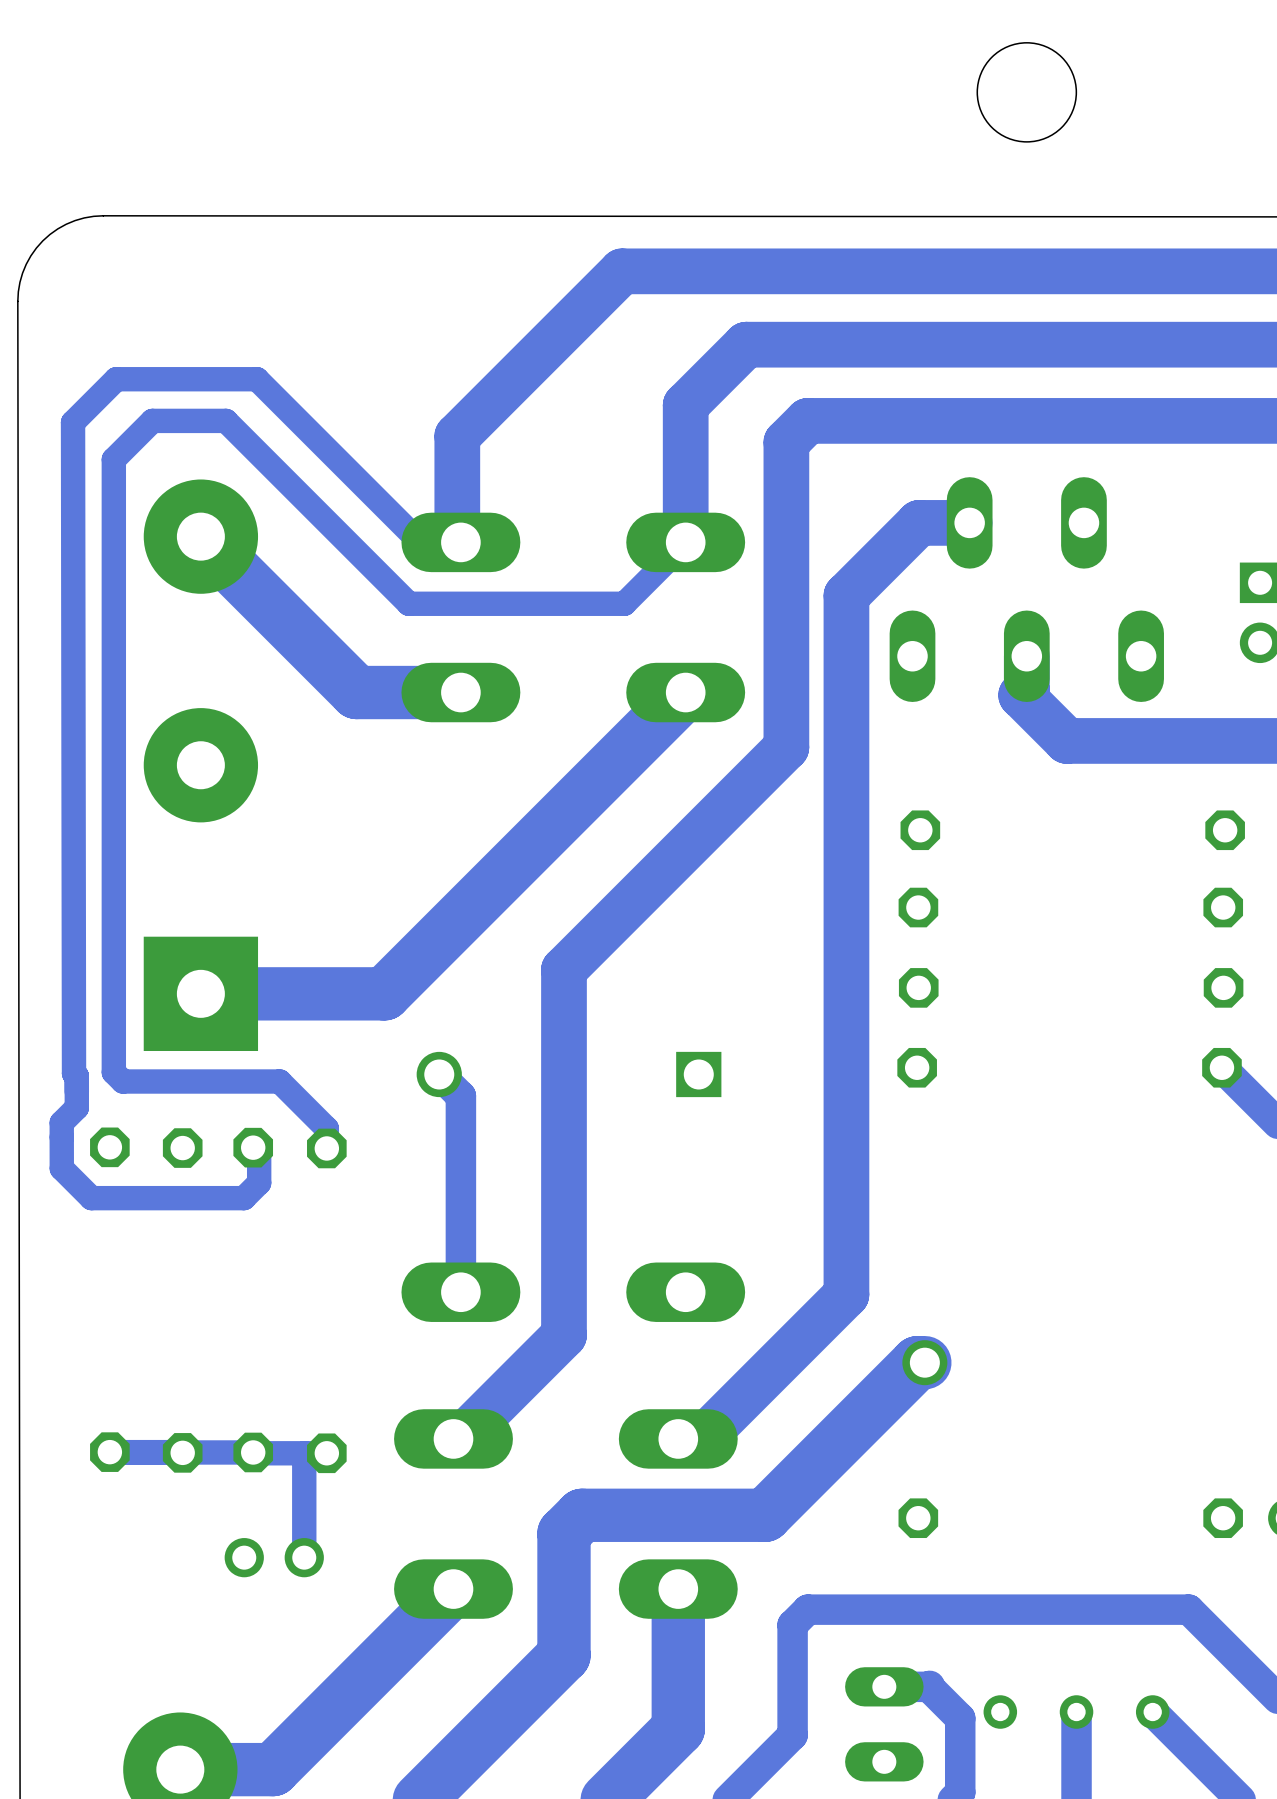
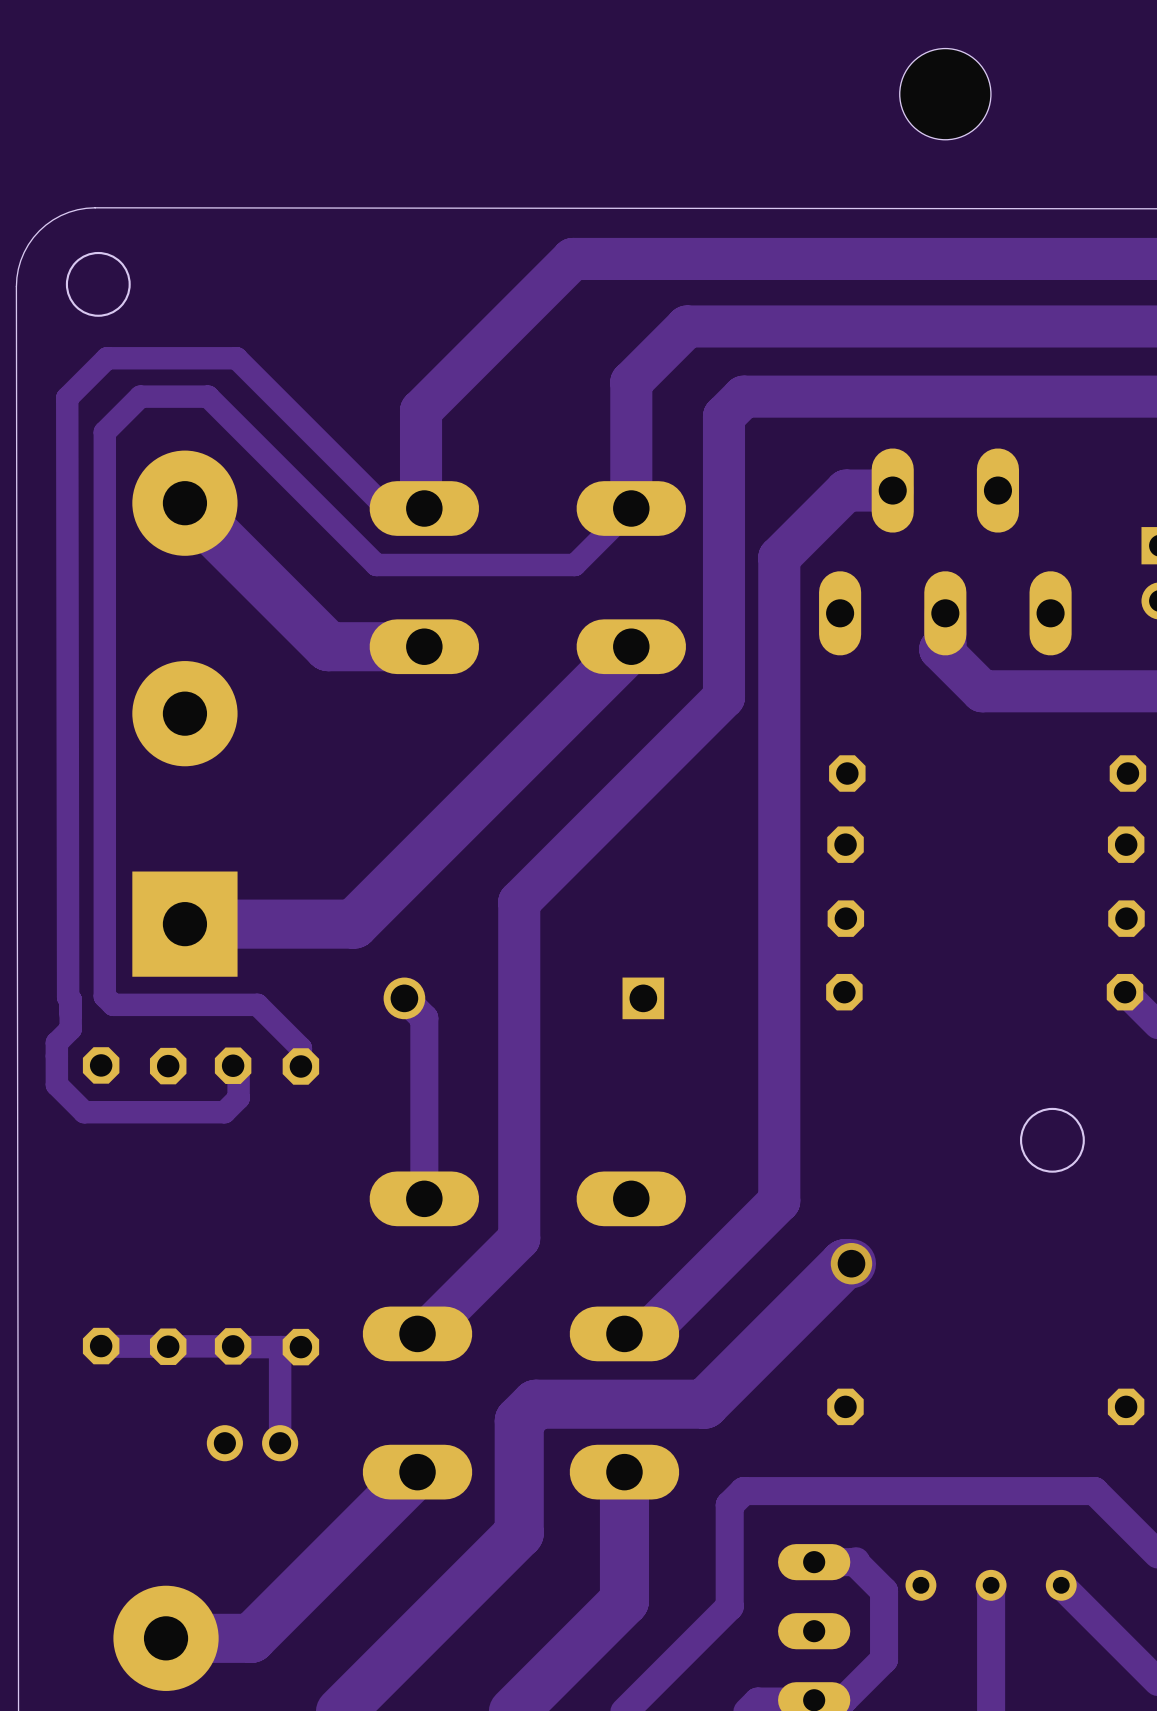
round board edge: none -> [65, 251, 131, 317]
round board edge: none -> [1020, 1107, 1085, 1173]

